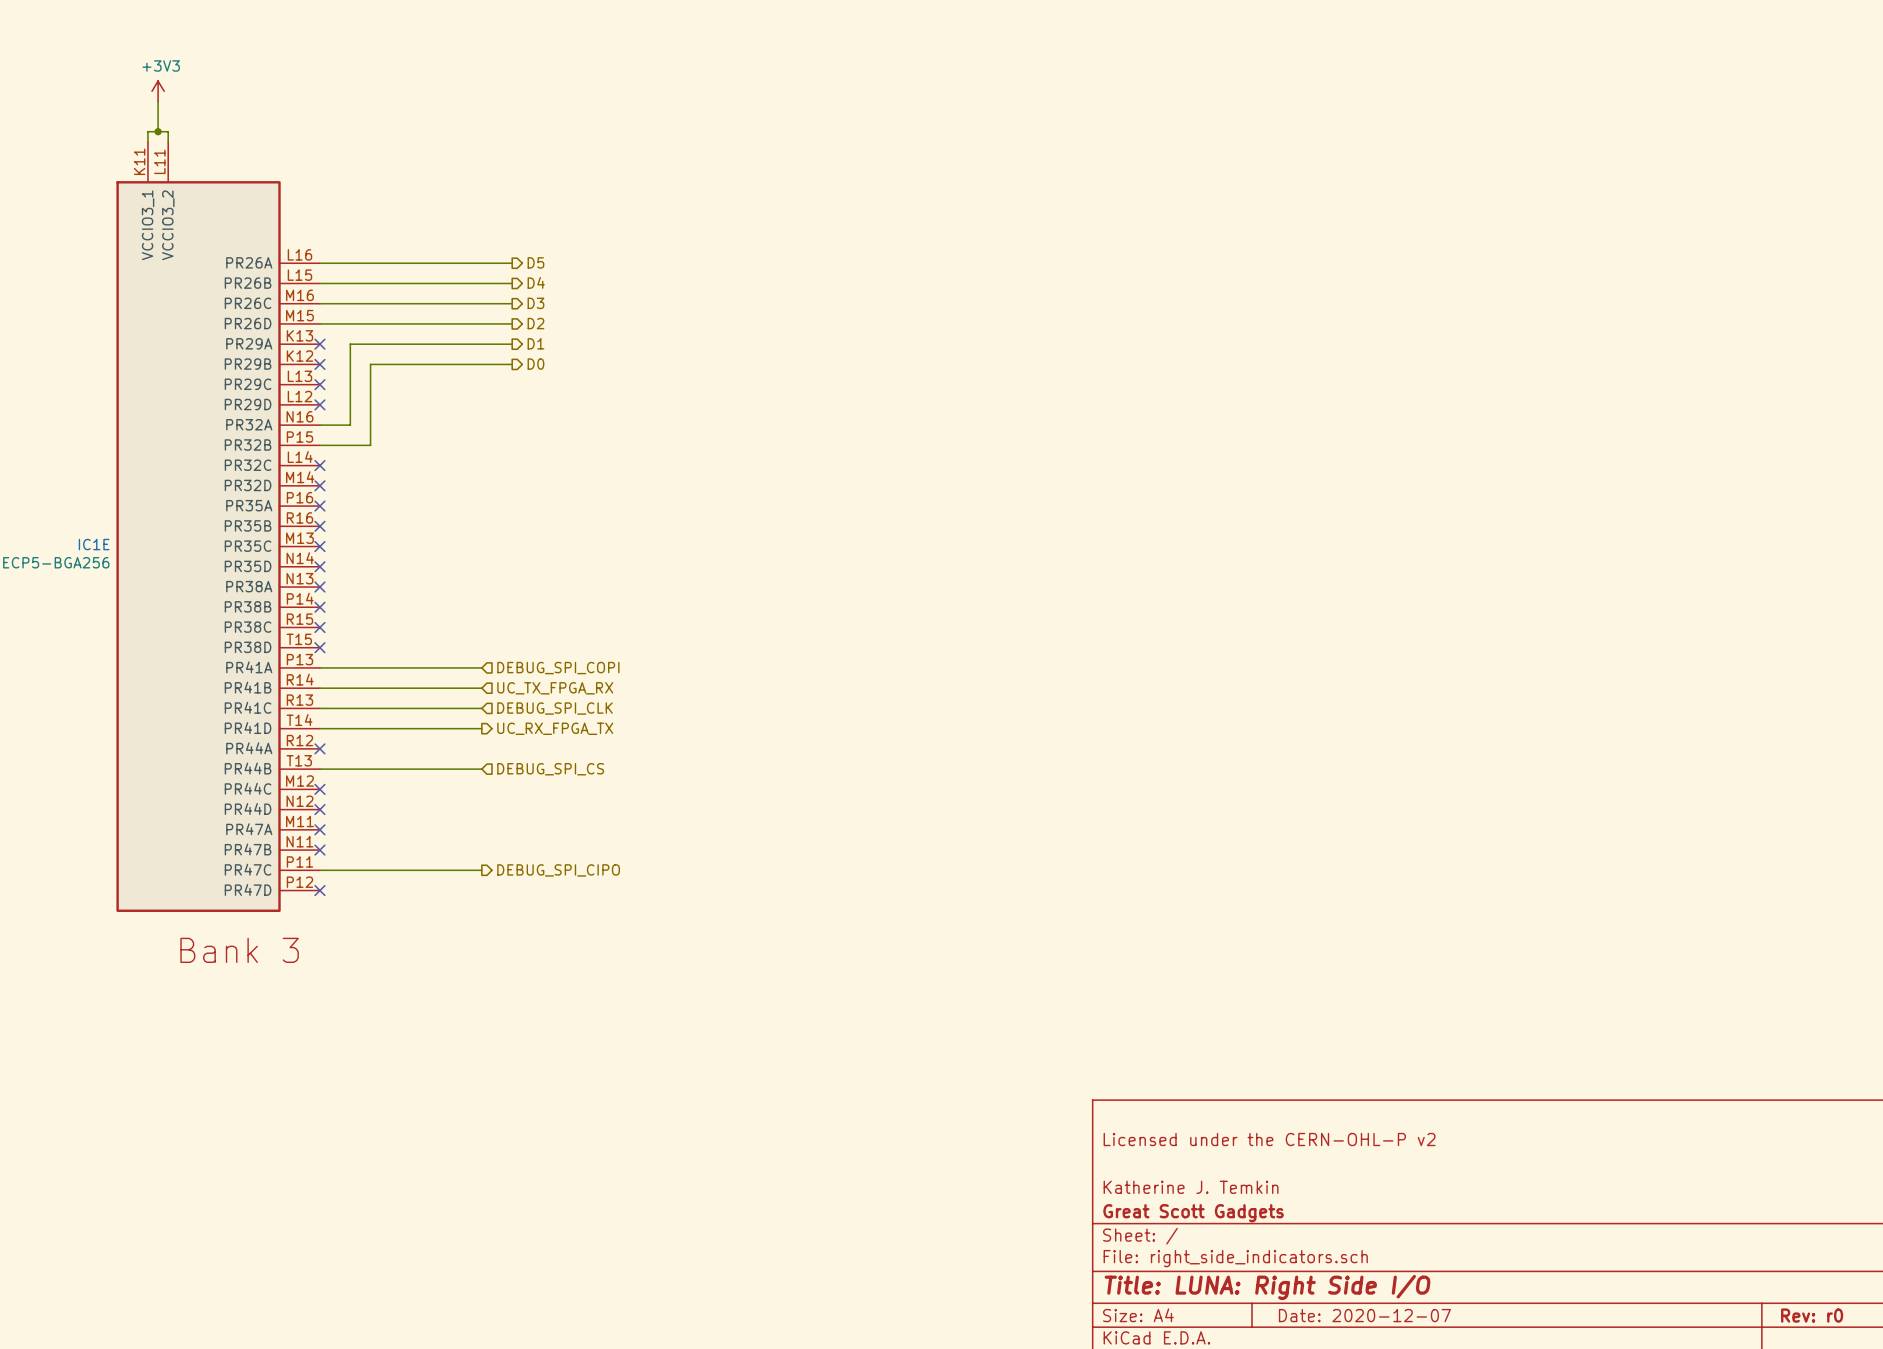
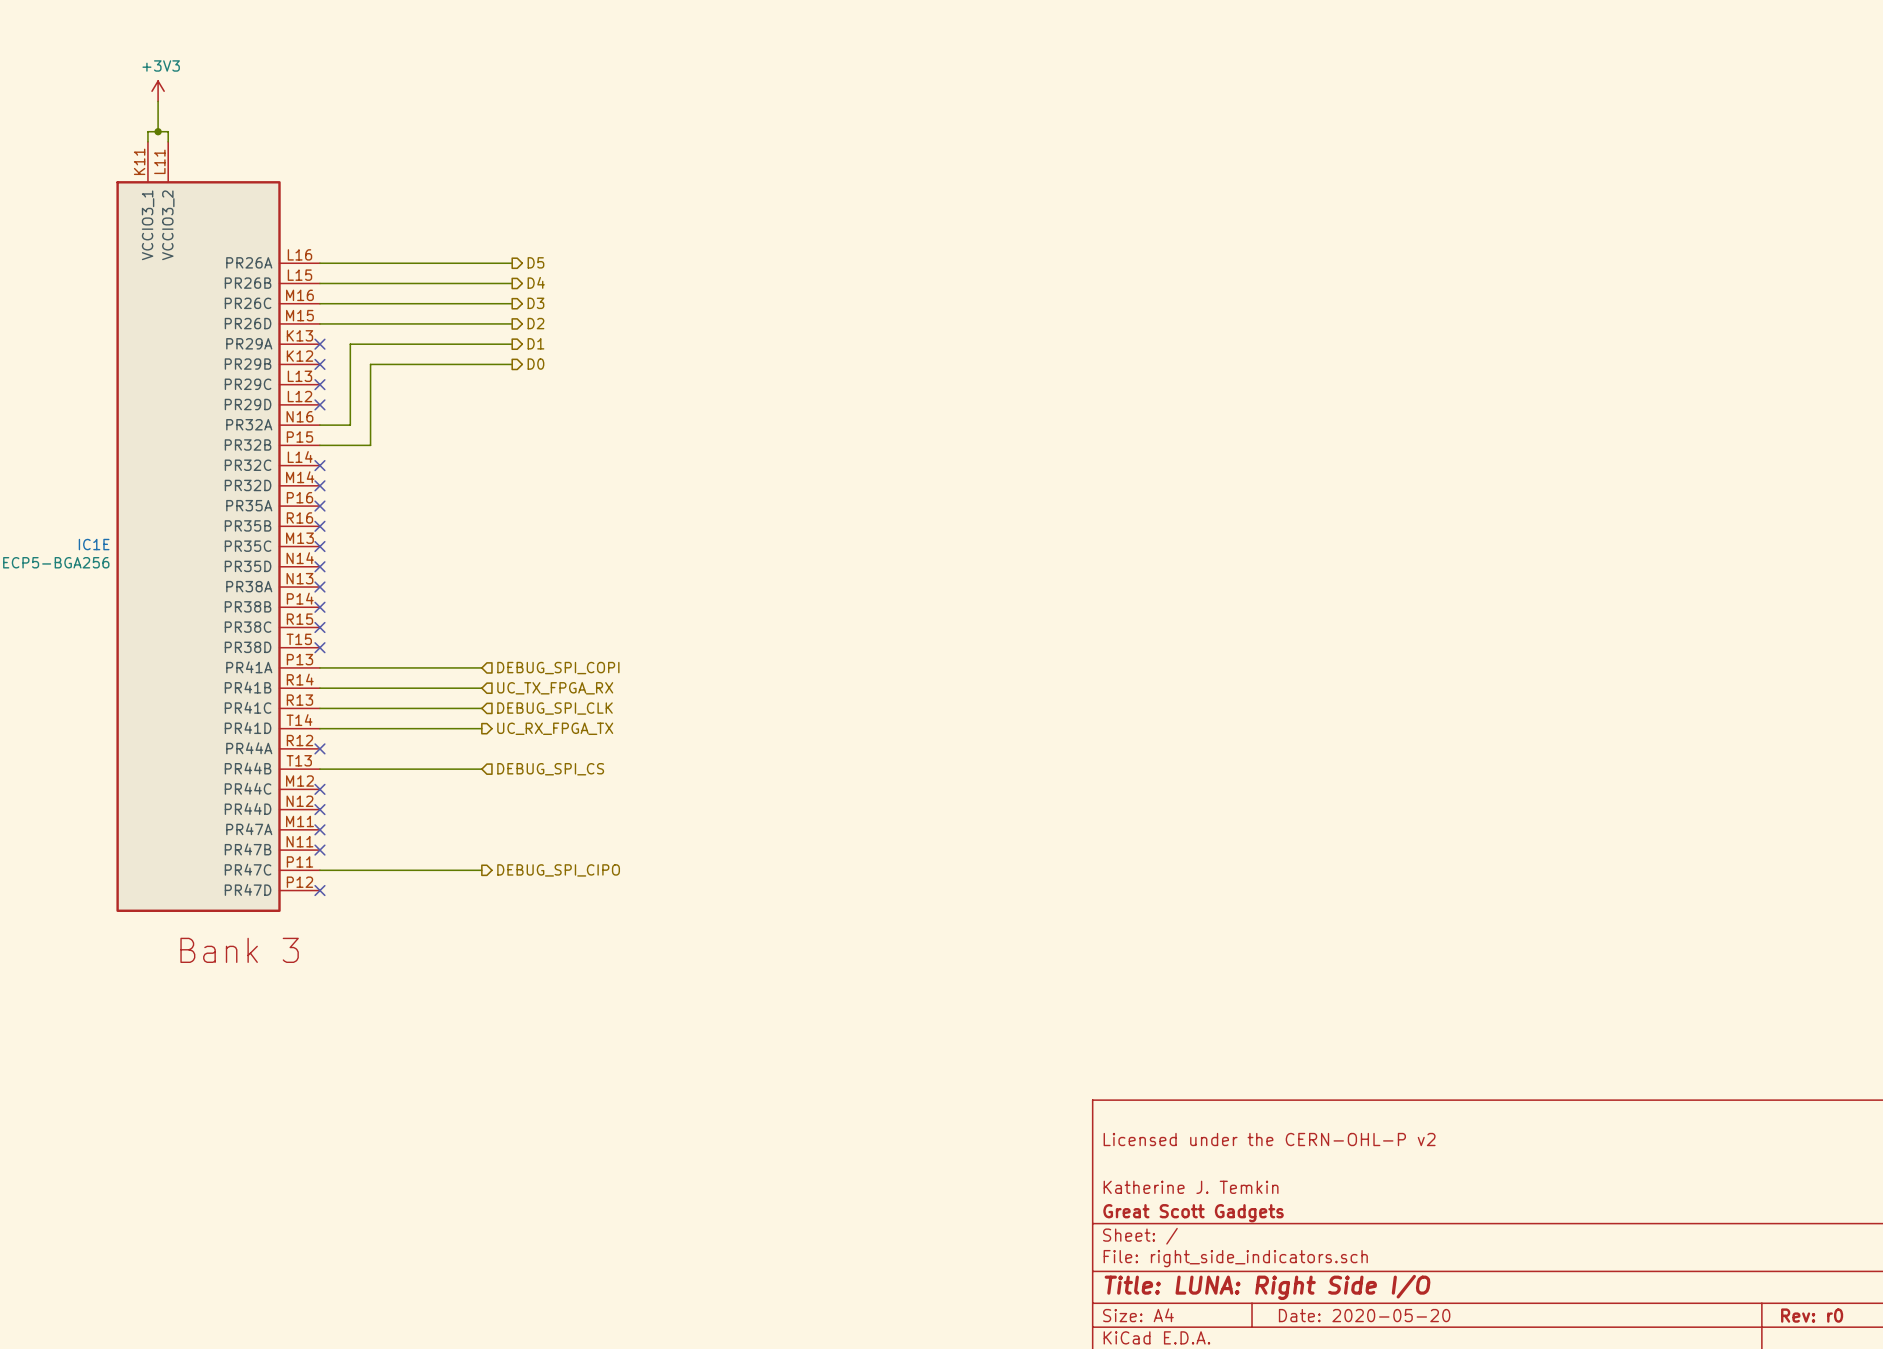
title block: Date: 2020-12-07 (1364, 1315) -> Date: 2020-05-20 (1364, 1315)

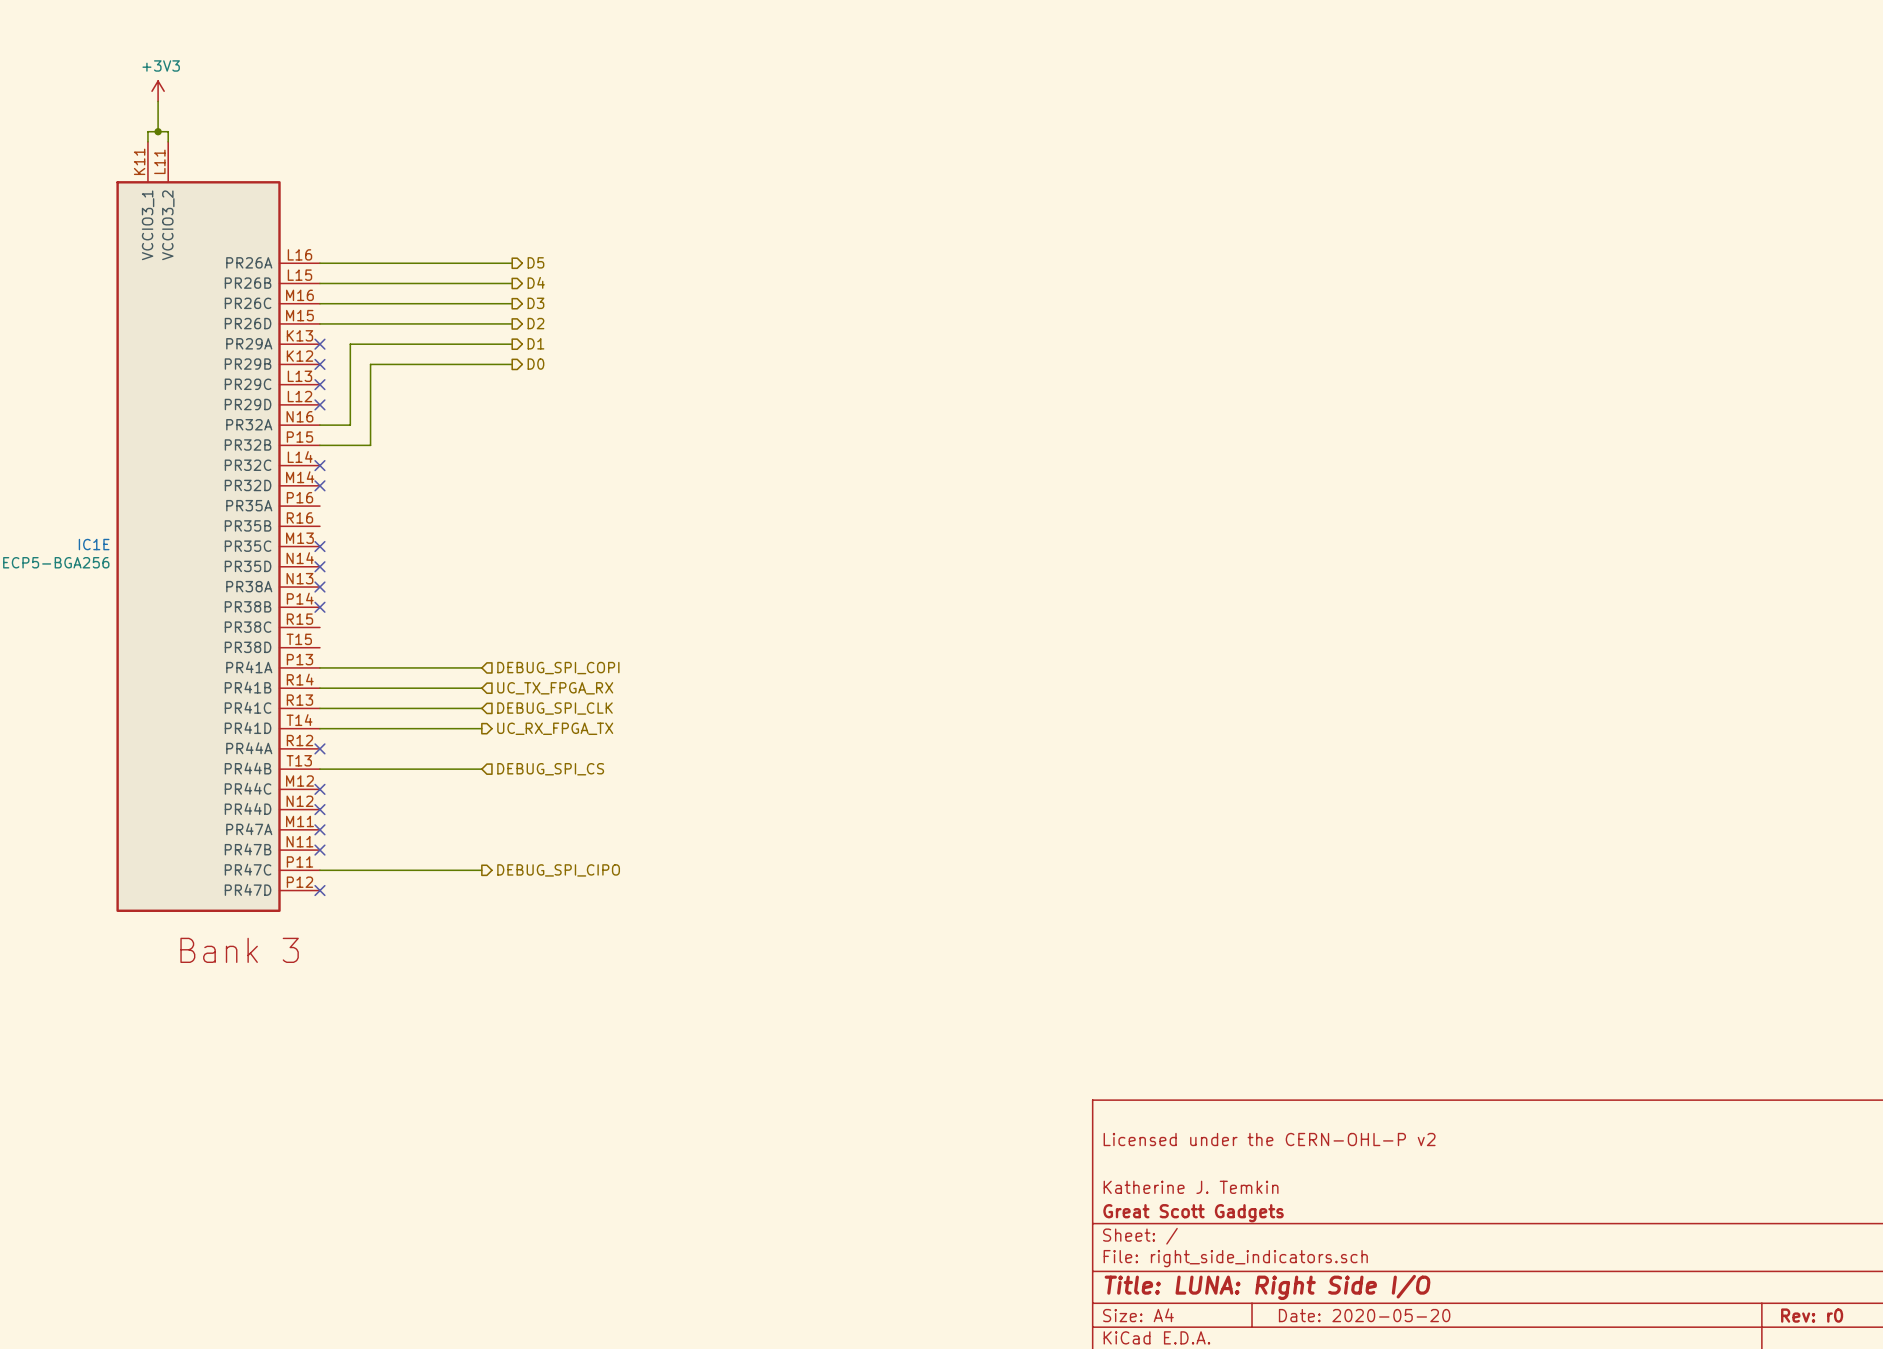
no-connect mark: (319, 506) -> none
no-connect mark: (319, 526) -> none
no-connect mark: (319, 627) -> none
no-connect mark: (319, 647) -> none

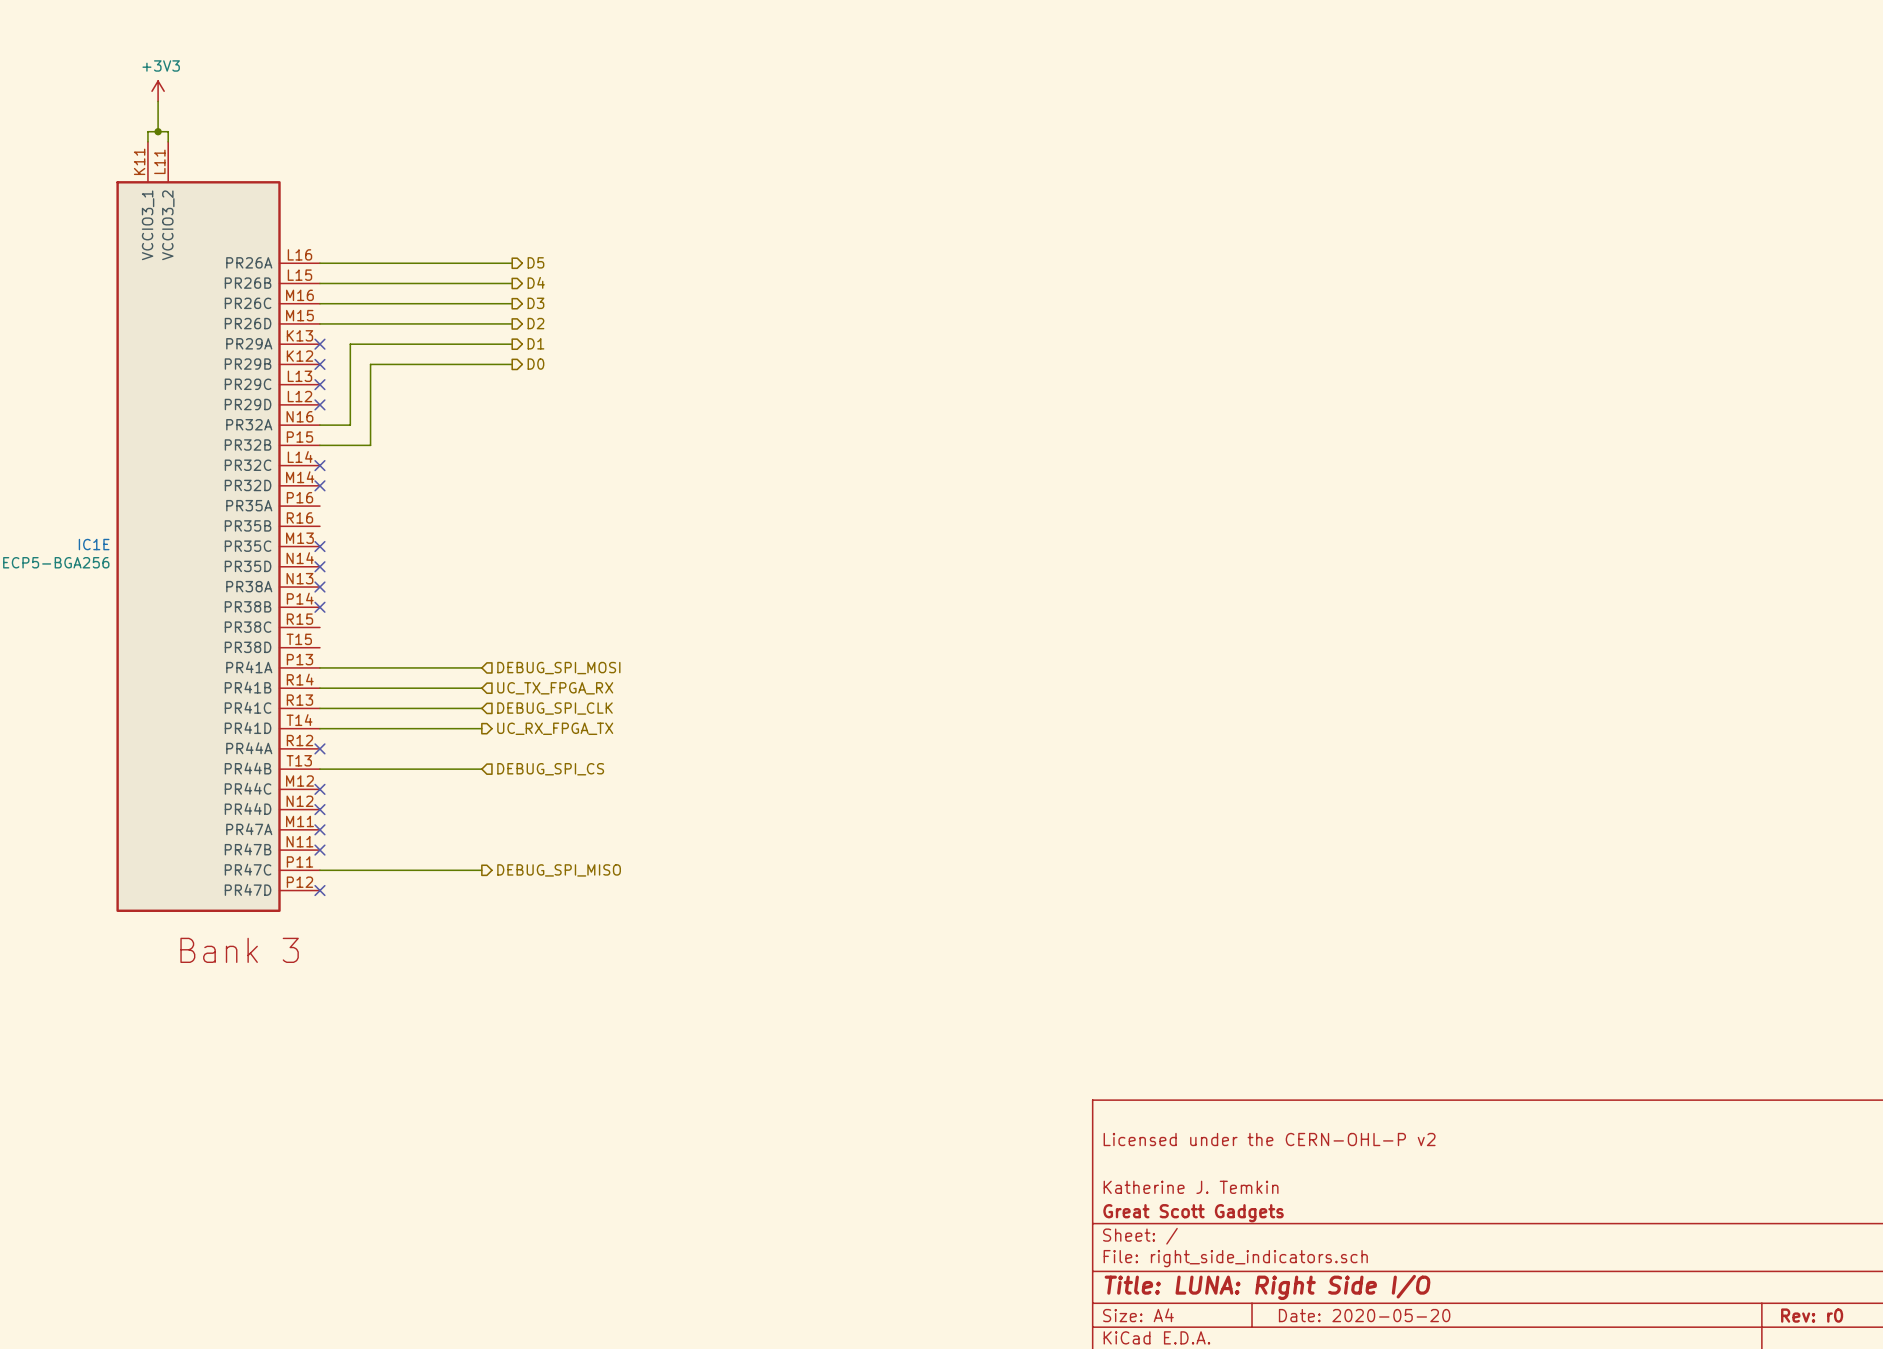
hierarchical label: DEBUG_SPI_COPI (558, 668) -> DEBUG_SPI_MOSI (558, 668)
hierarchical label: DEBUG_SPI_CIPO (558, 870) -> DEBUG_SPI_MISO (559, 870)

